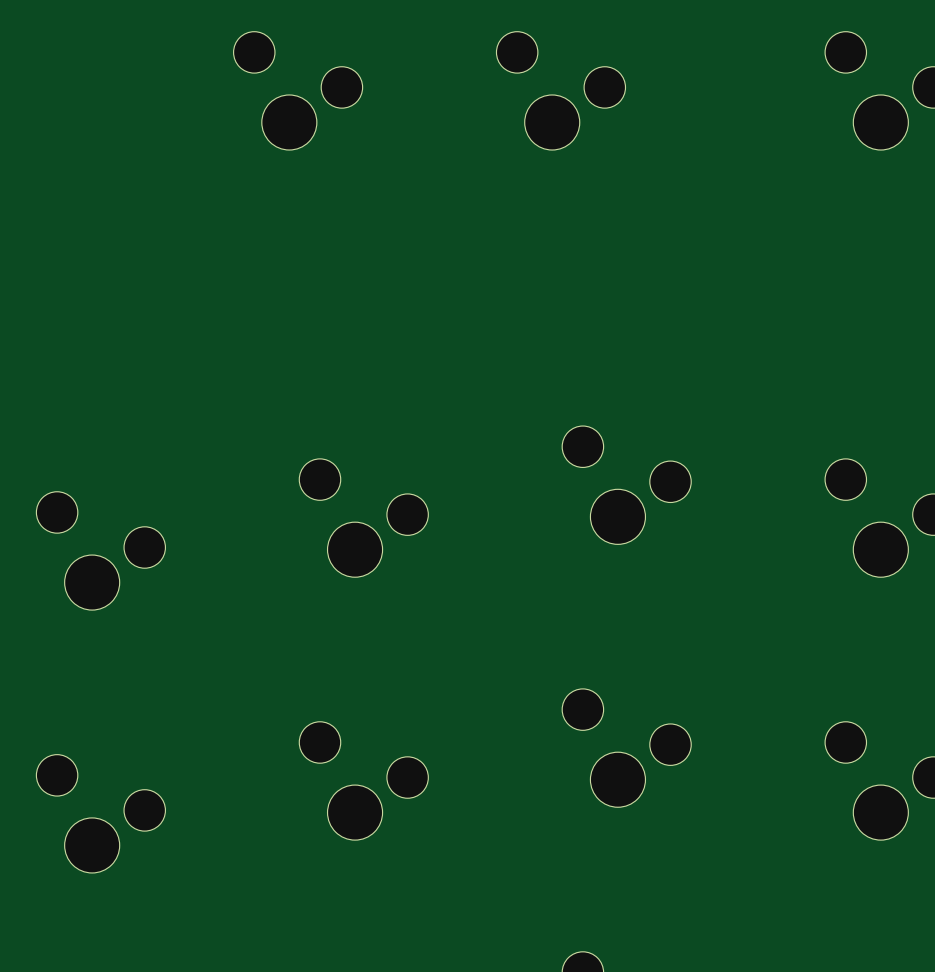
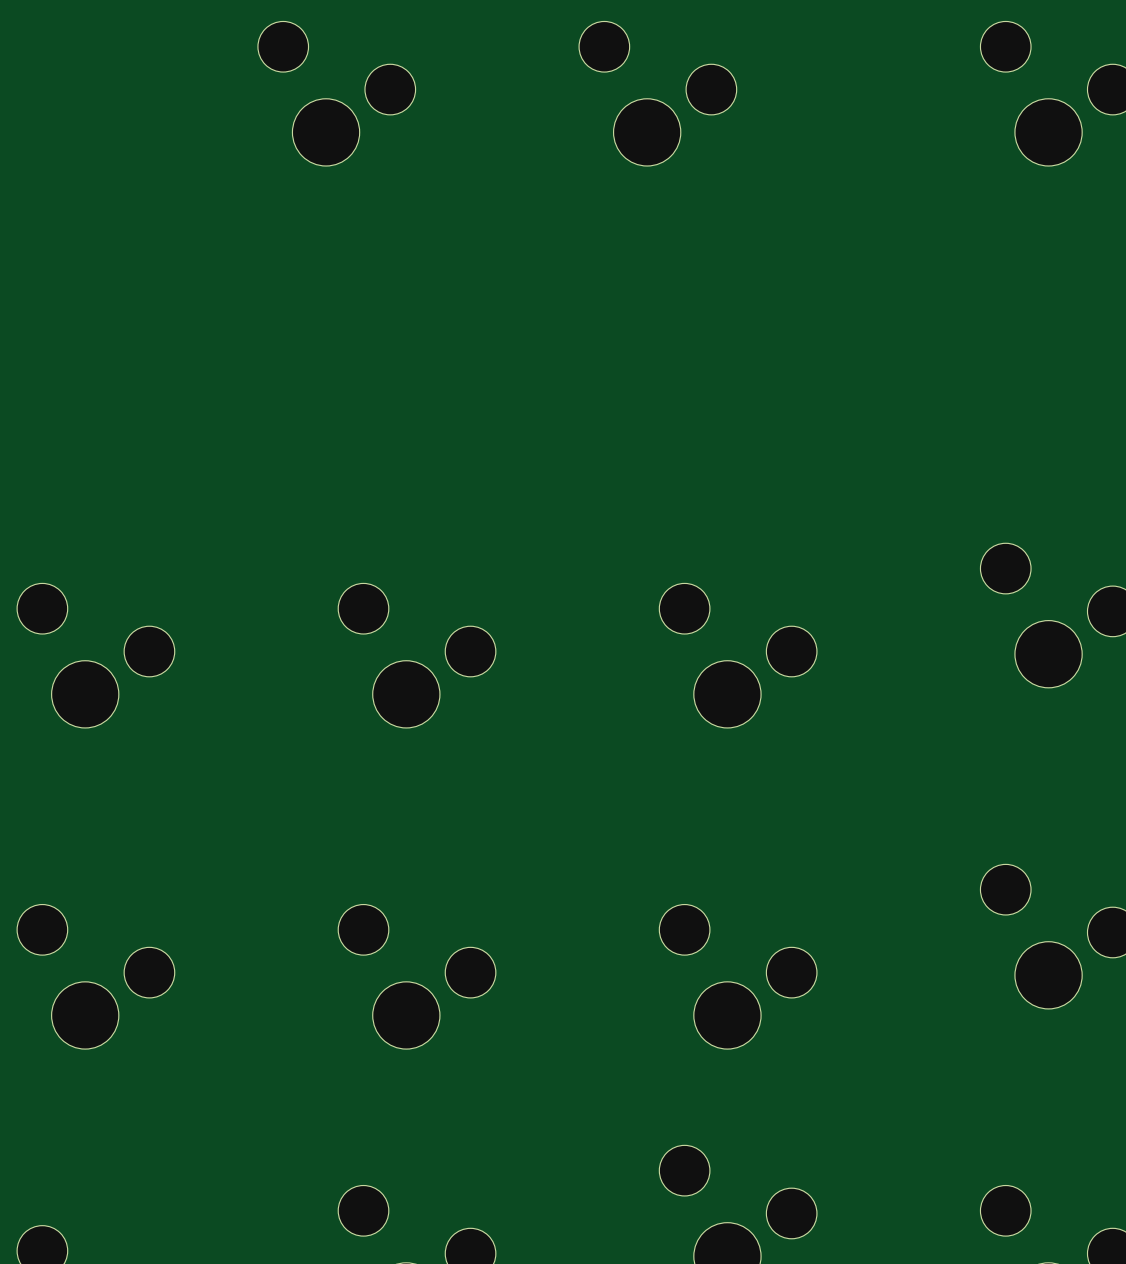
part position: (626, 485) -> (738, 655)
part position: (363, 518) -> (417, 655)
part position: (626, 748) -> (738, 976)
part position: (363, 780) -> (417, 976)

